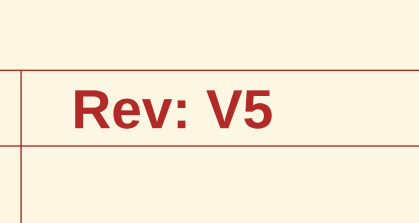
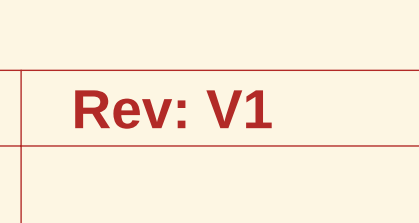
title block: Rev: V5 (173, 109) -> Rev: V1 (173, 109)

